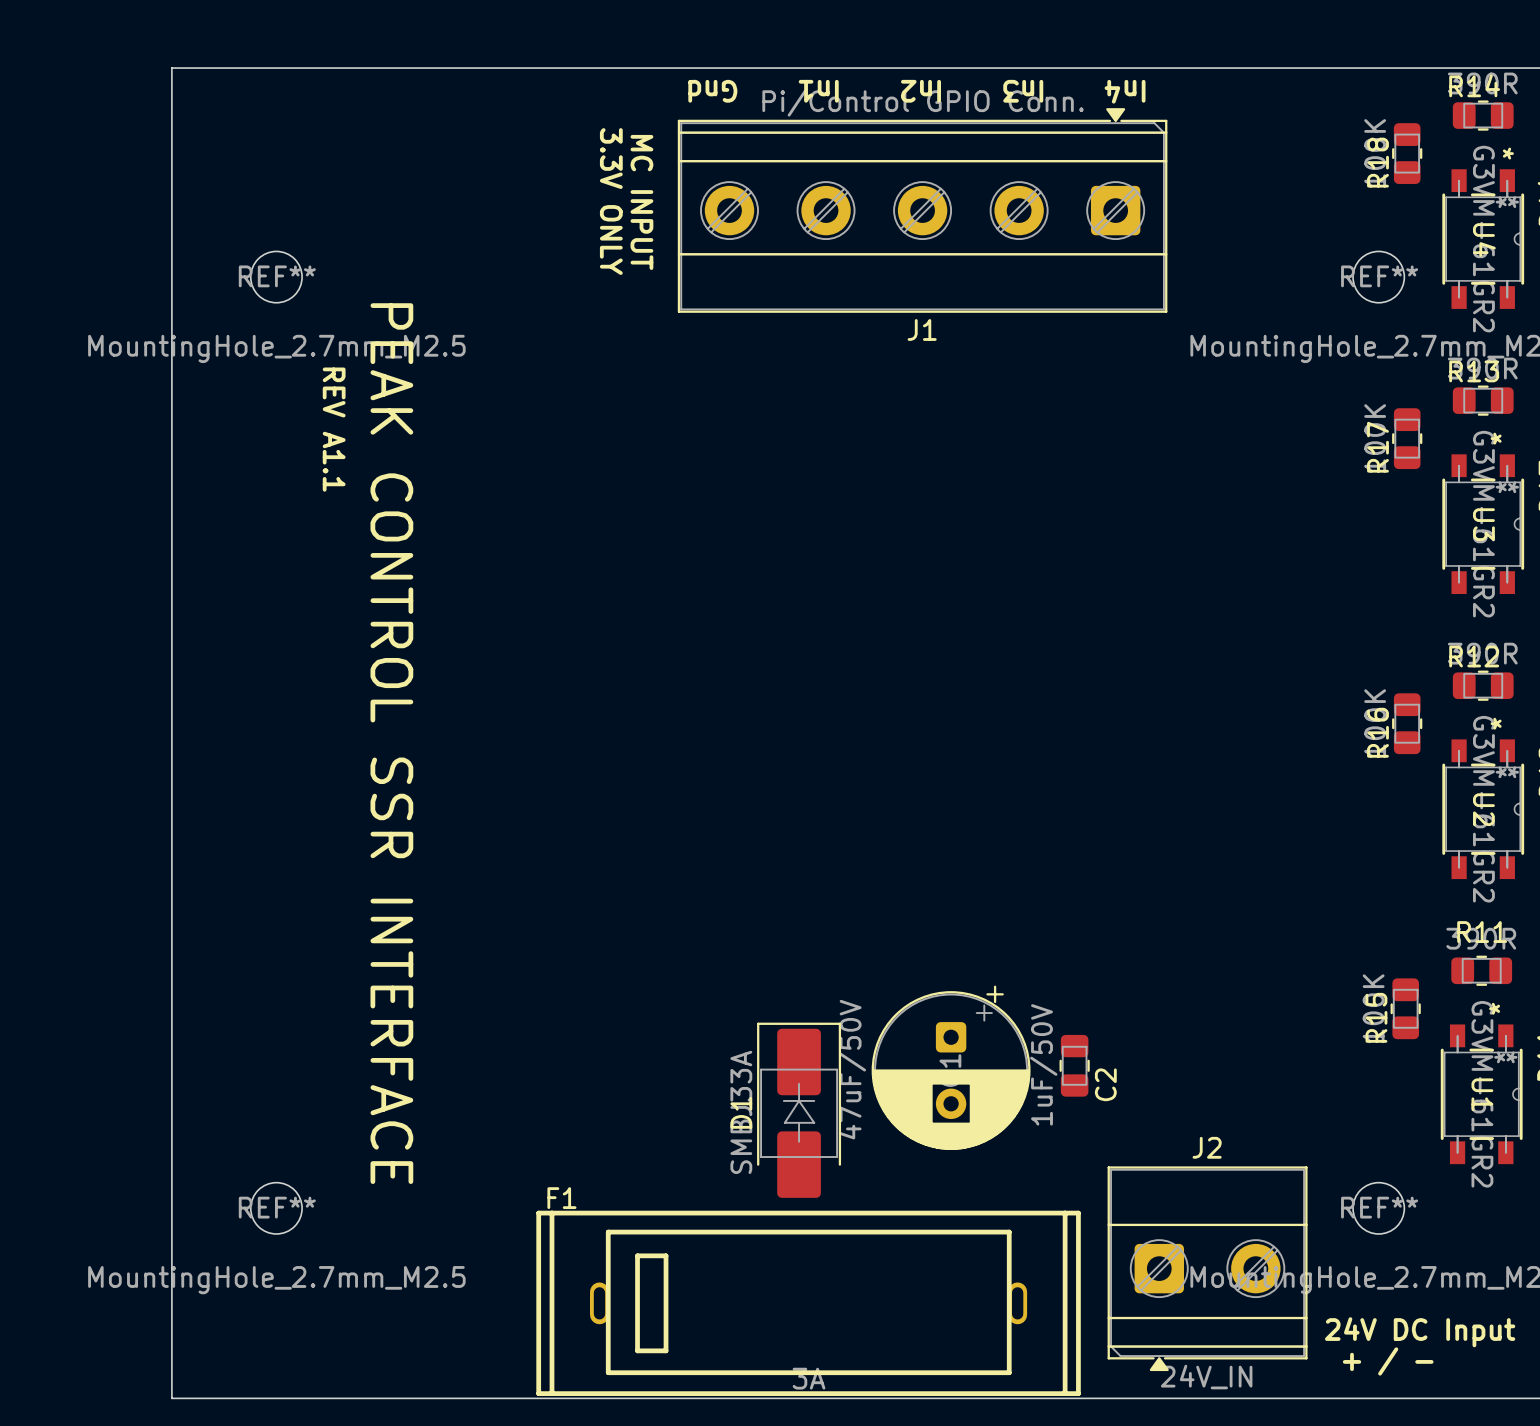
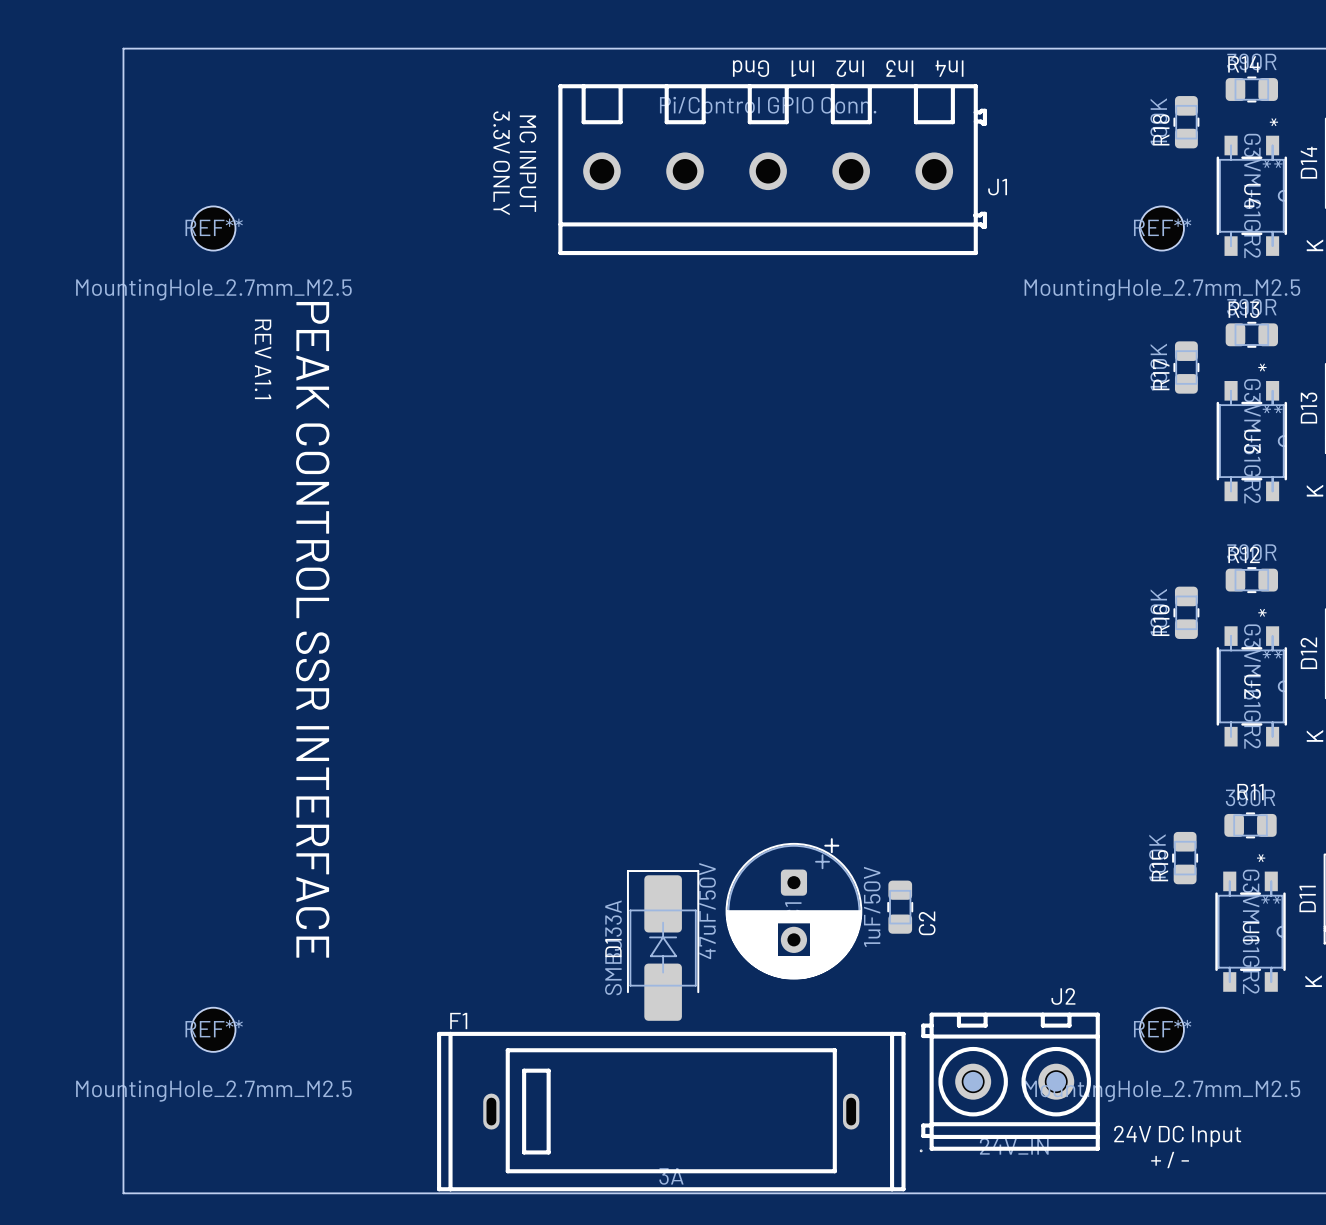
J1 footprint: [677, 108, 1168, 313] -> [558, 84, 987, 256]
J1 name position: J1 (922, 329) -> J1 (997, 187)
J2 name position: J2 (1207, 1147) -> J2 (1063, 996)
J2 footprint: [1107, 1166, 1308, 1372] -> [920, 1012, 1100, 1152]
F1 footprint: [536, 1210, 1081, 1397] -> [437, 1031, 906, 1192]

